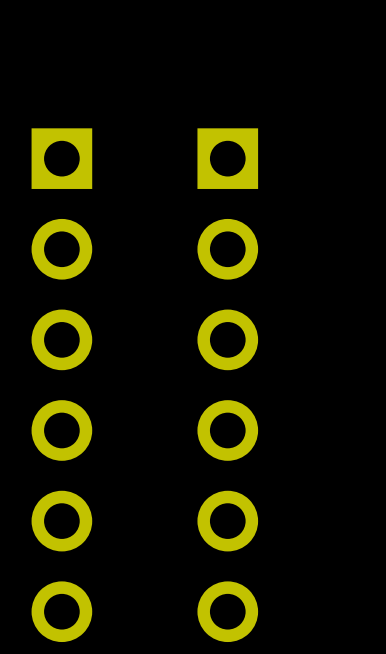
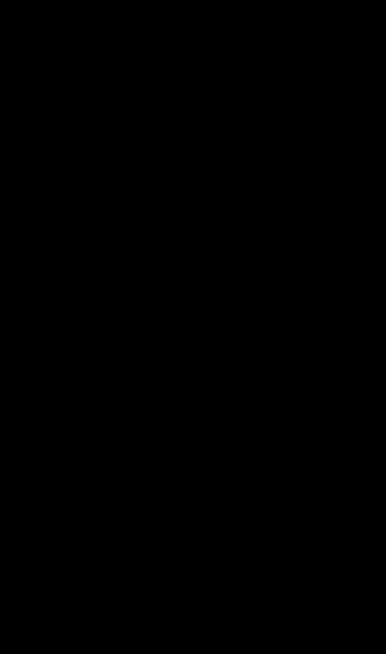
part: (61, 385) -> none
part: (227, 385) -> none

